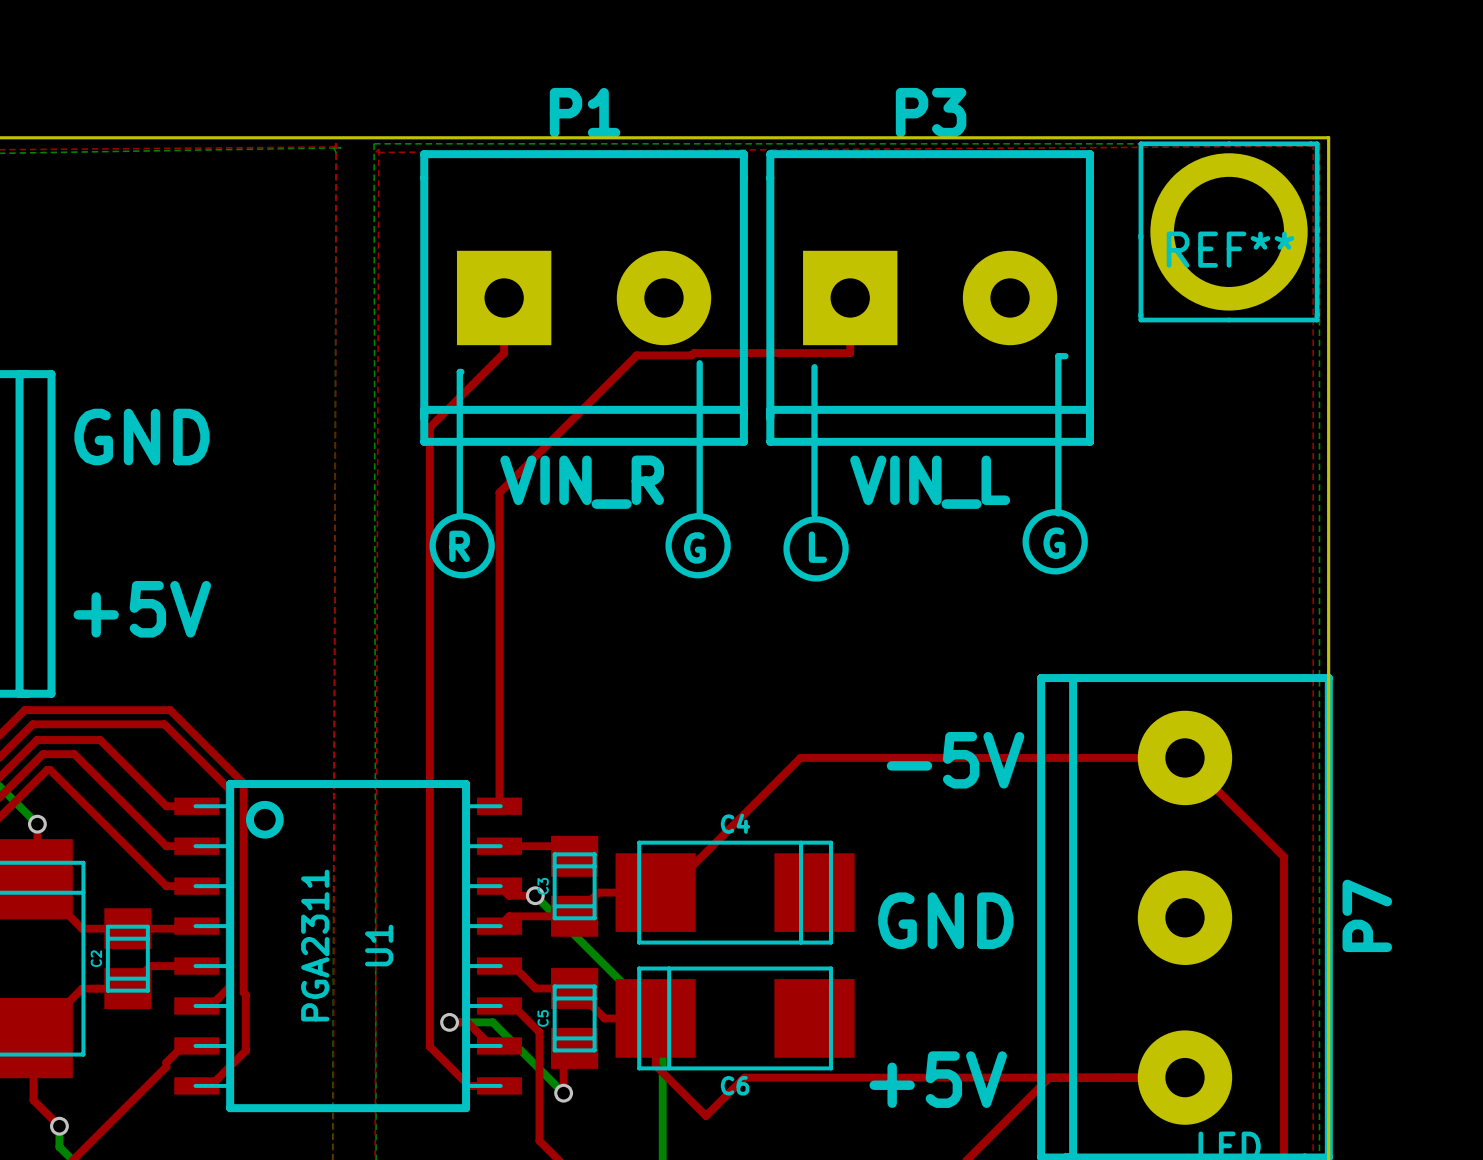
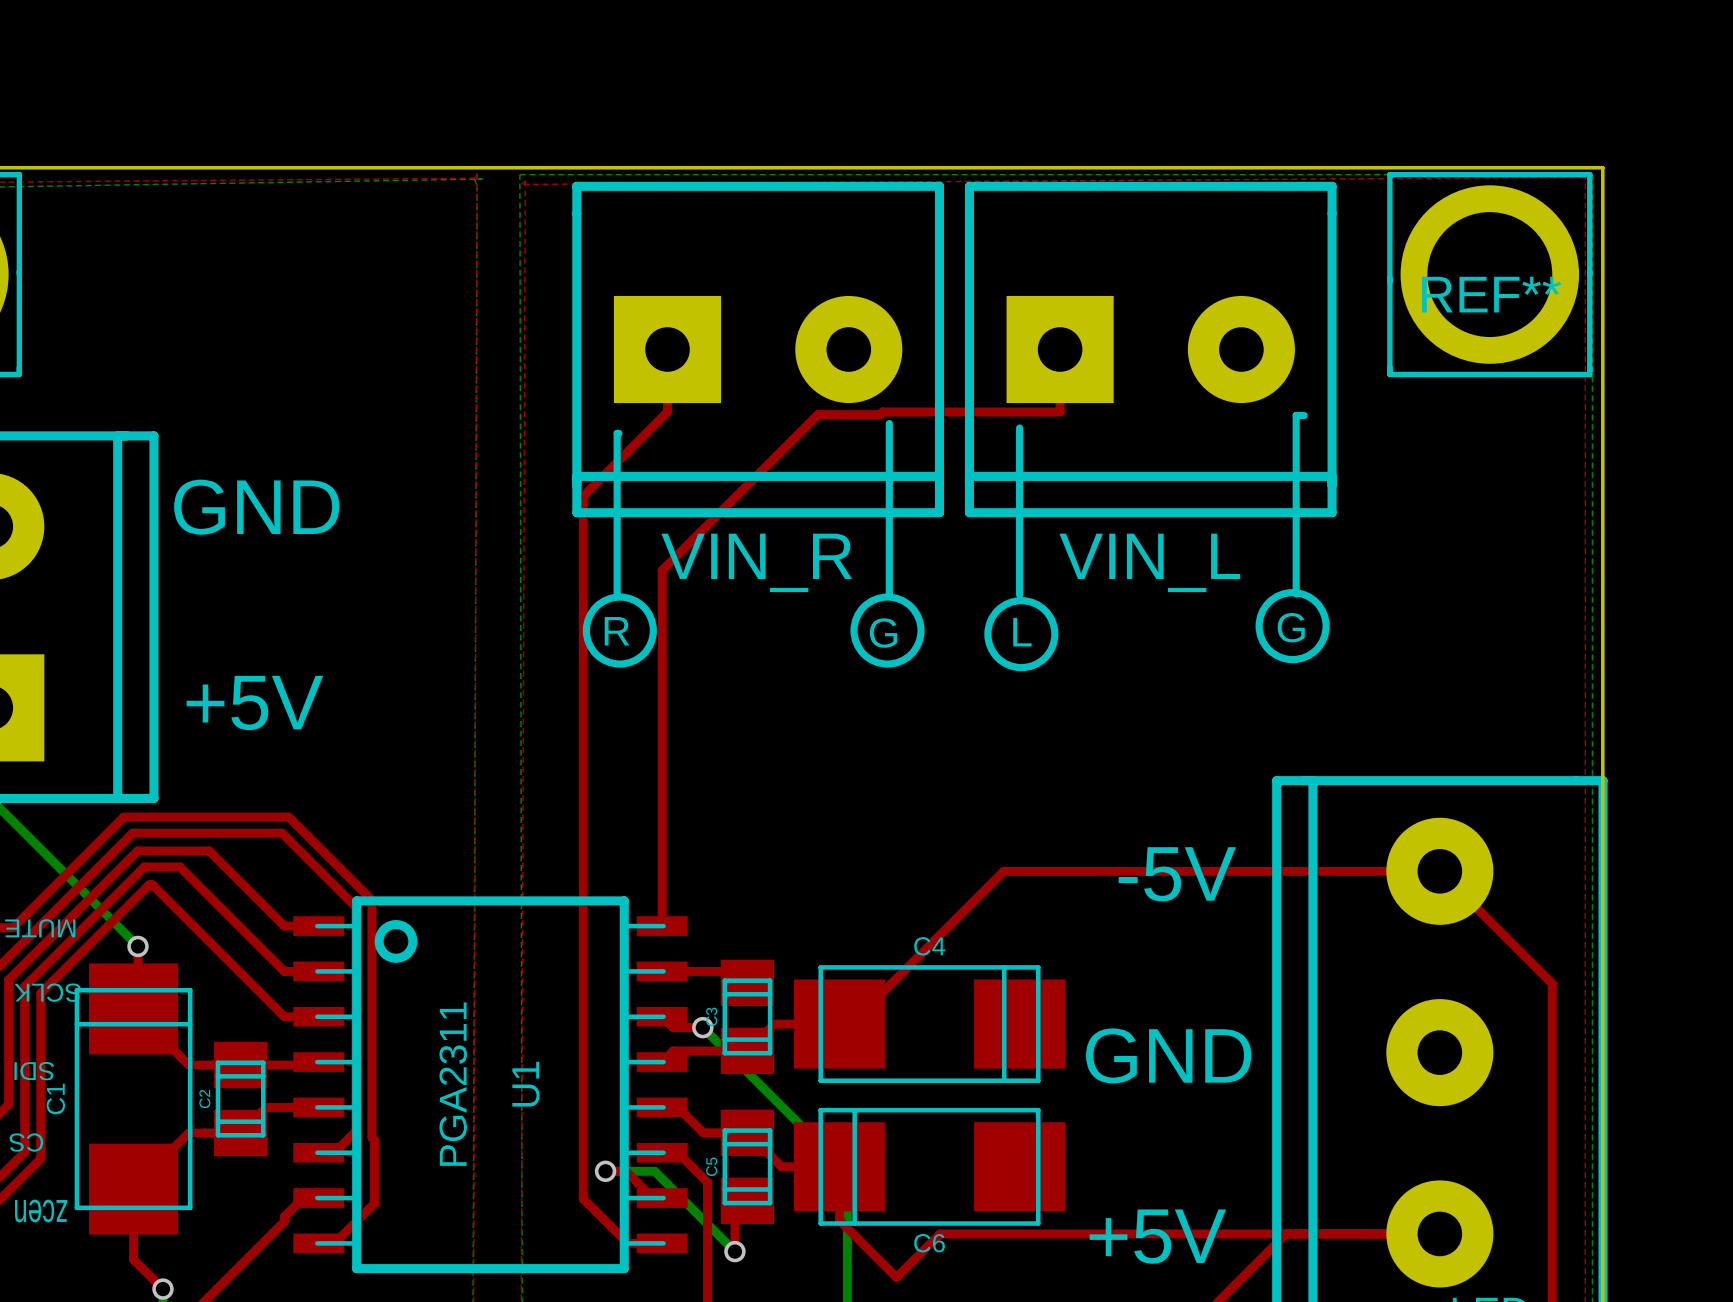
P1 name: P1 (585, 112) -> none
P3 name: P3 (931, 112) -> none
P7 name: P7 (1367, 915) -> none

